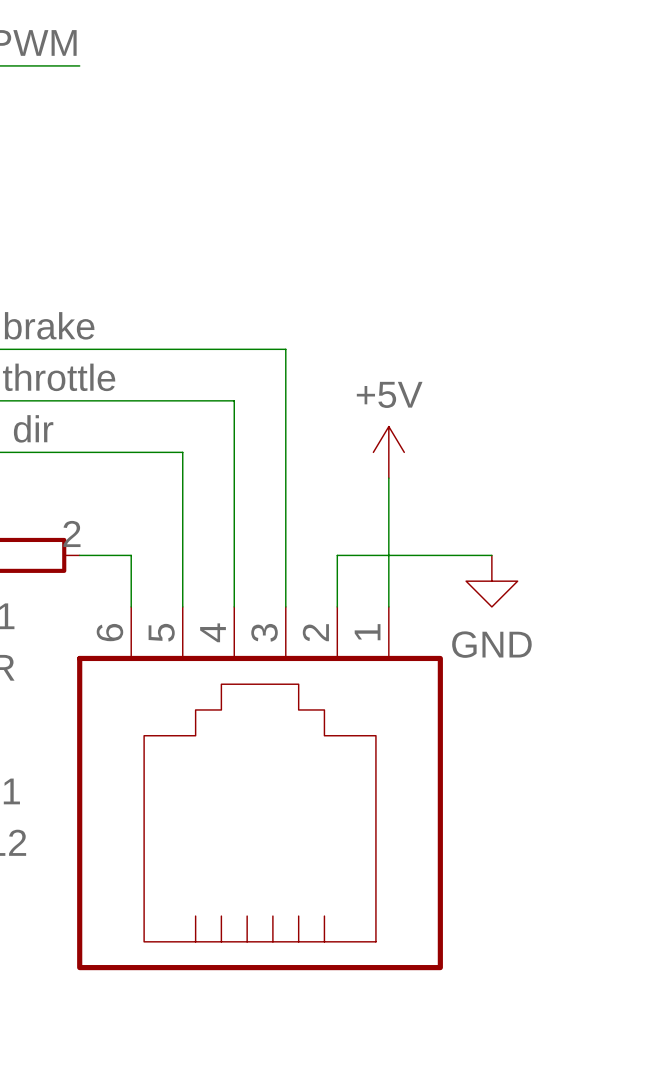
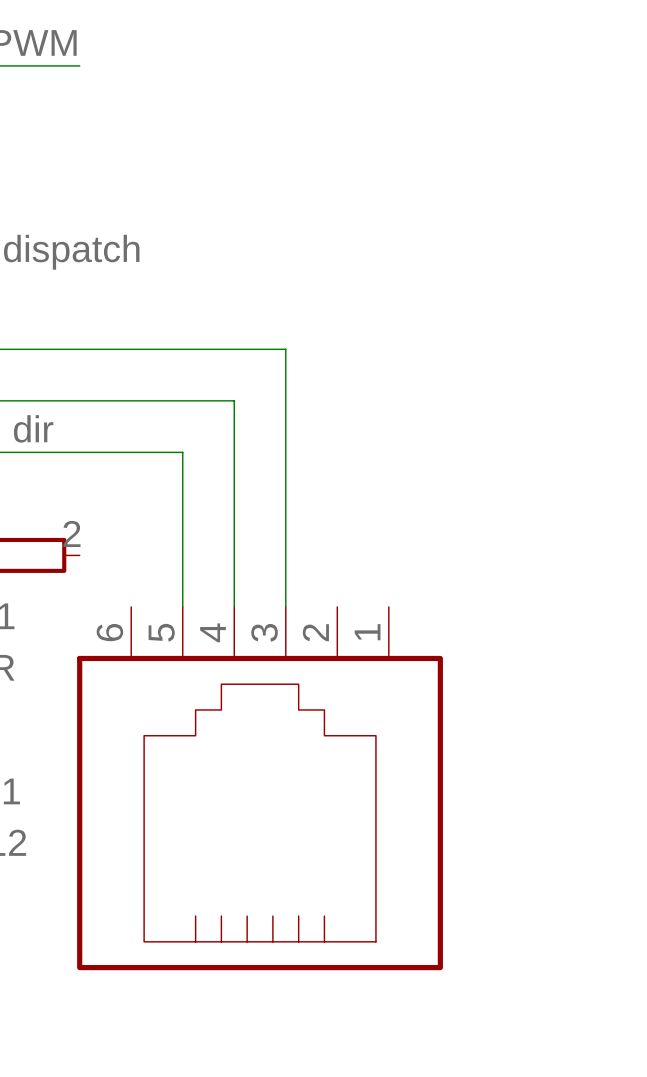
label: none -> dispatch (71, 252)
label: brake (49, 325) -> none
label: throttle (59, 377) -> none
power symbol: +5V (388, 452) -> none
wire: (388, 478) (388, 606) -> none
wire: (79, 555) (131, 555) (131, 606) -> none
wire: (491, 555) (337, 555) (337, 606) -> none
power symbol: GND (491, 581) -> none

